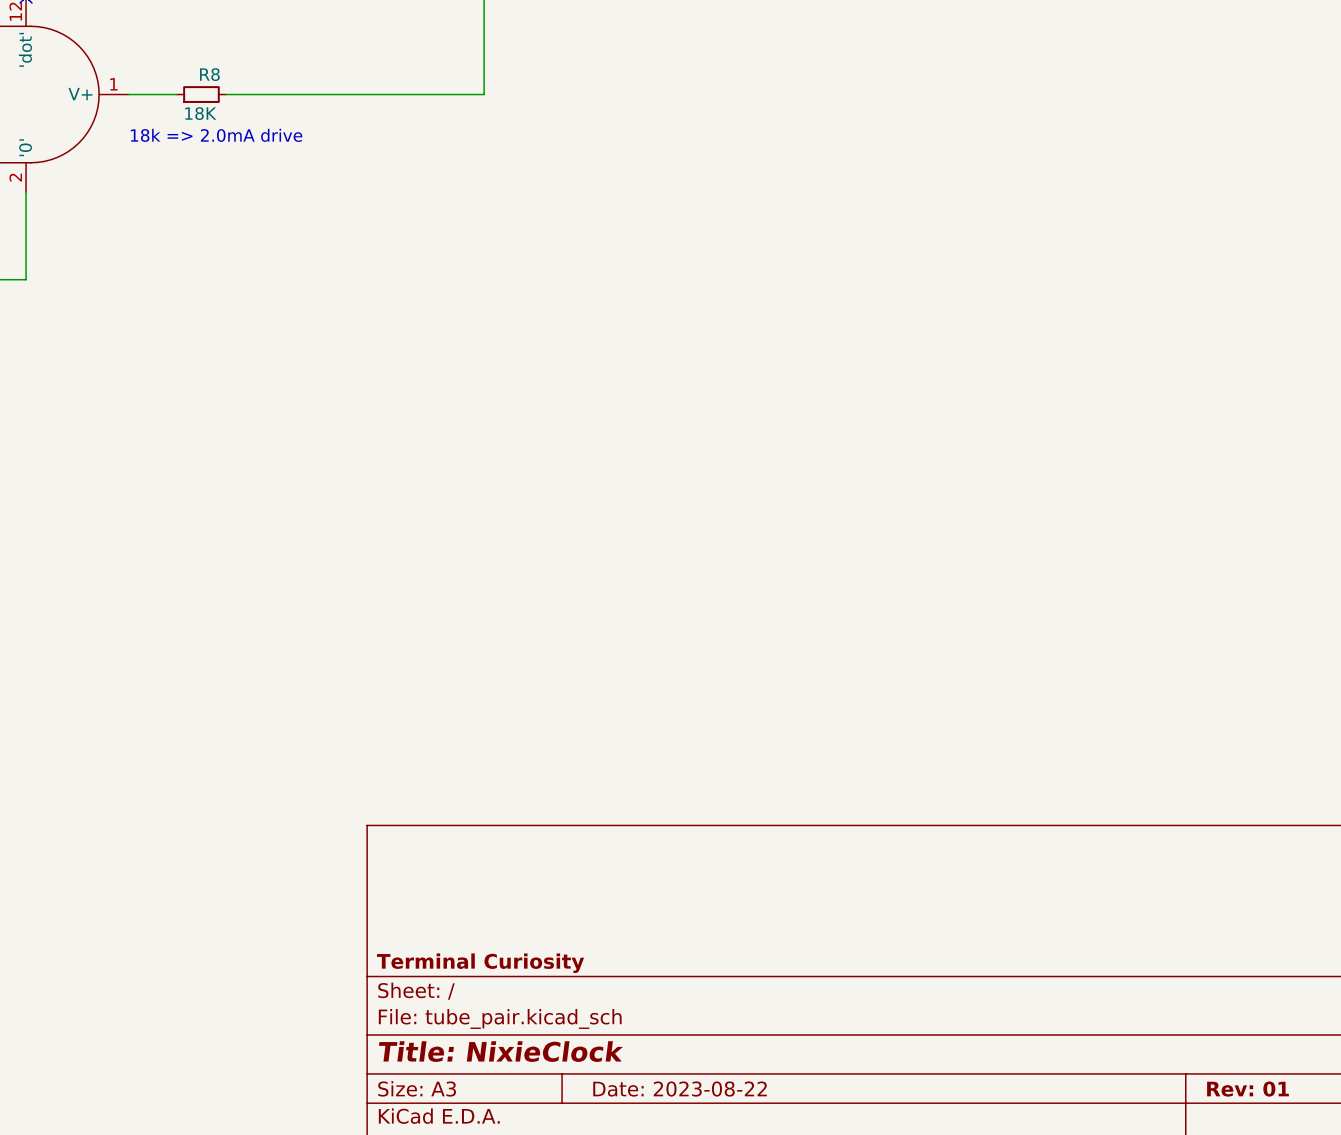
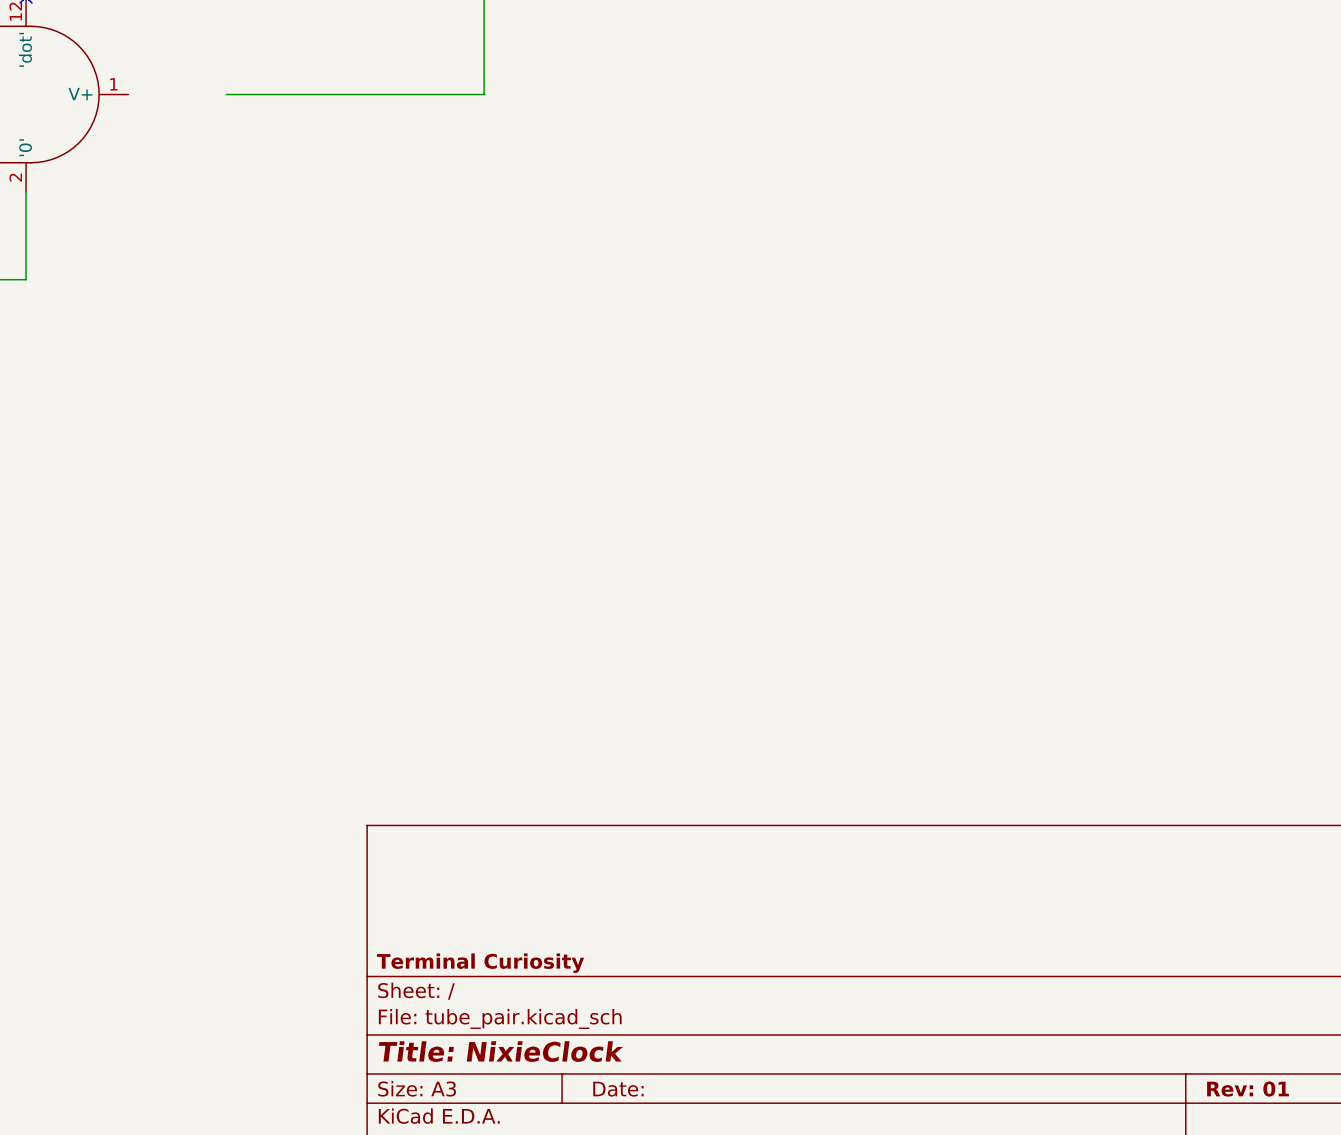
wire: (128, 94) (176, 94) -> none
R8: 18K (201, 94) -> none
text: 18k => 2.0mA drive (216, 135) -> none
title block: Date: 2023-08-22 (680, 1089) -> Date: (618, 1089)

